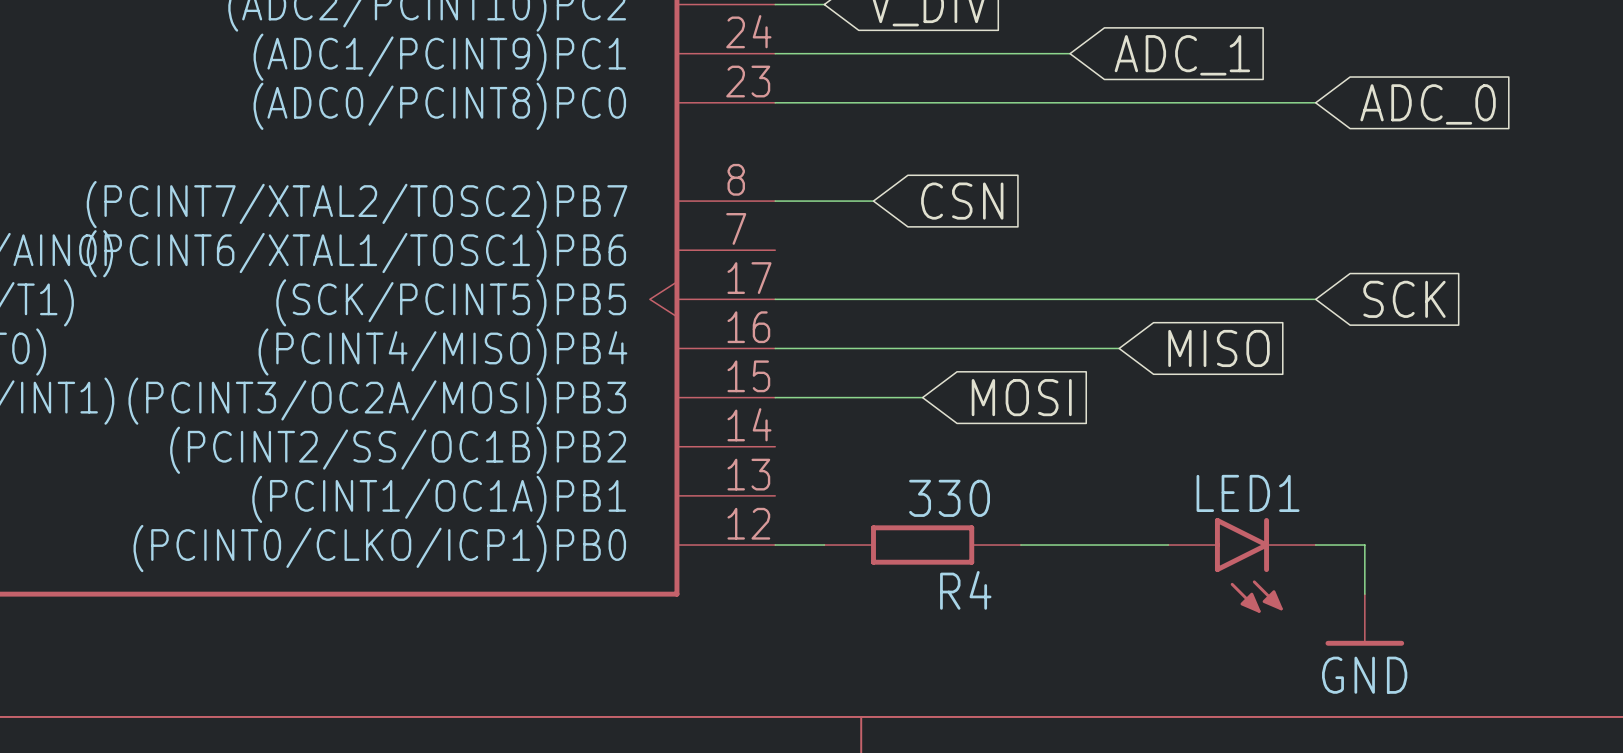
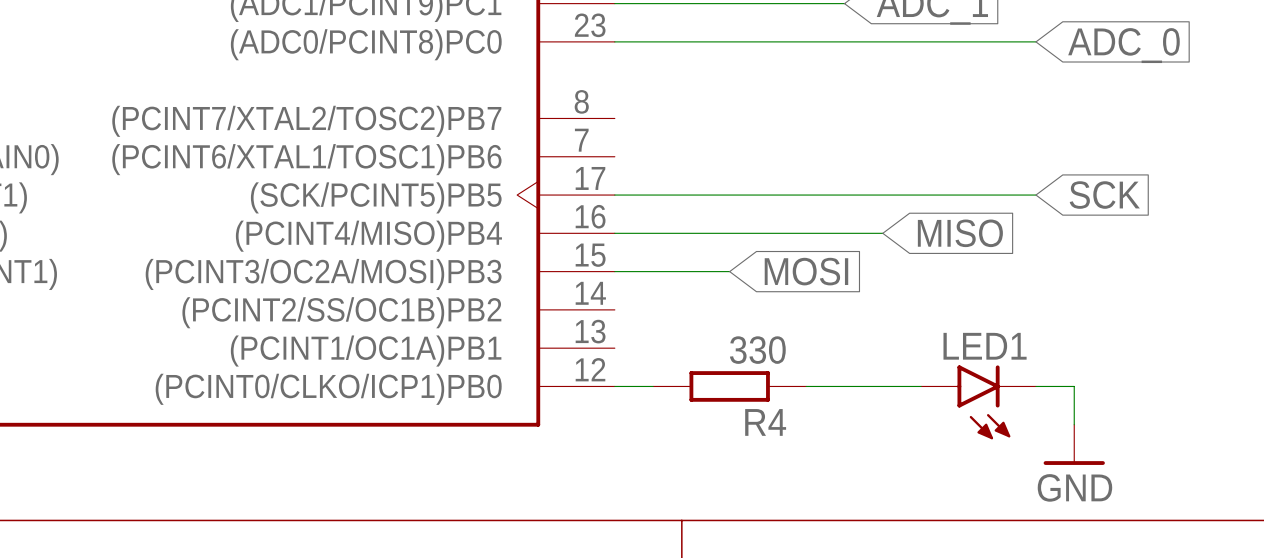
wire: (775, 201) (873, 201) -> none
global label: CSN (962, 201) -> none

